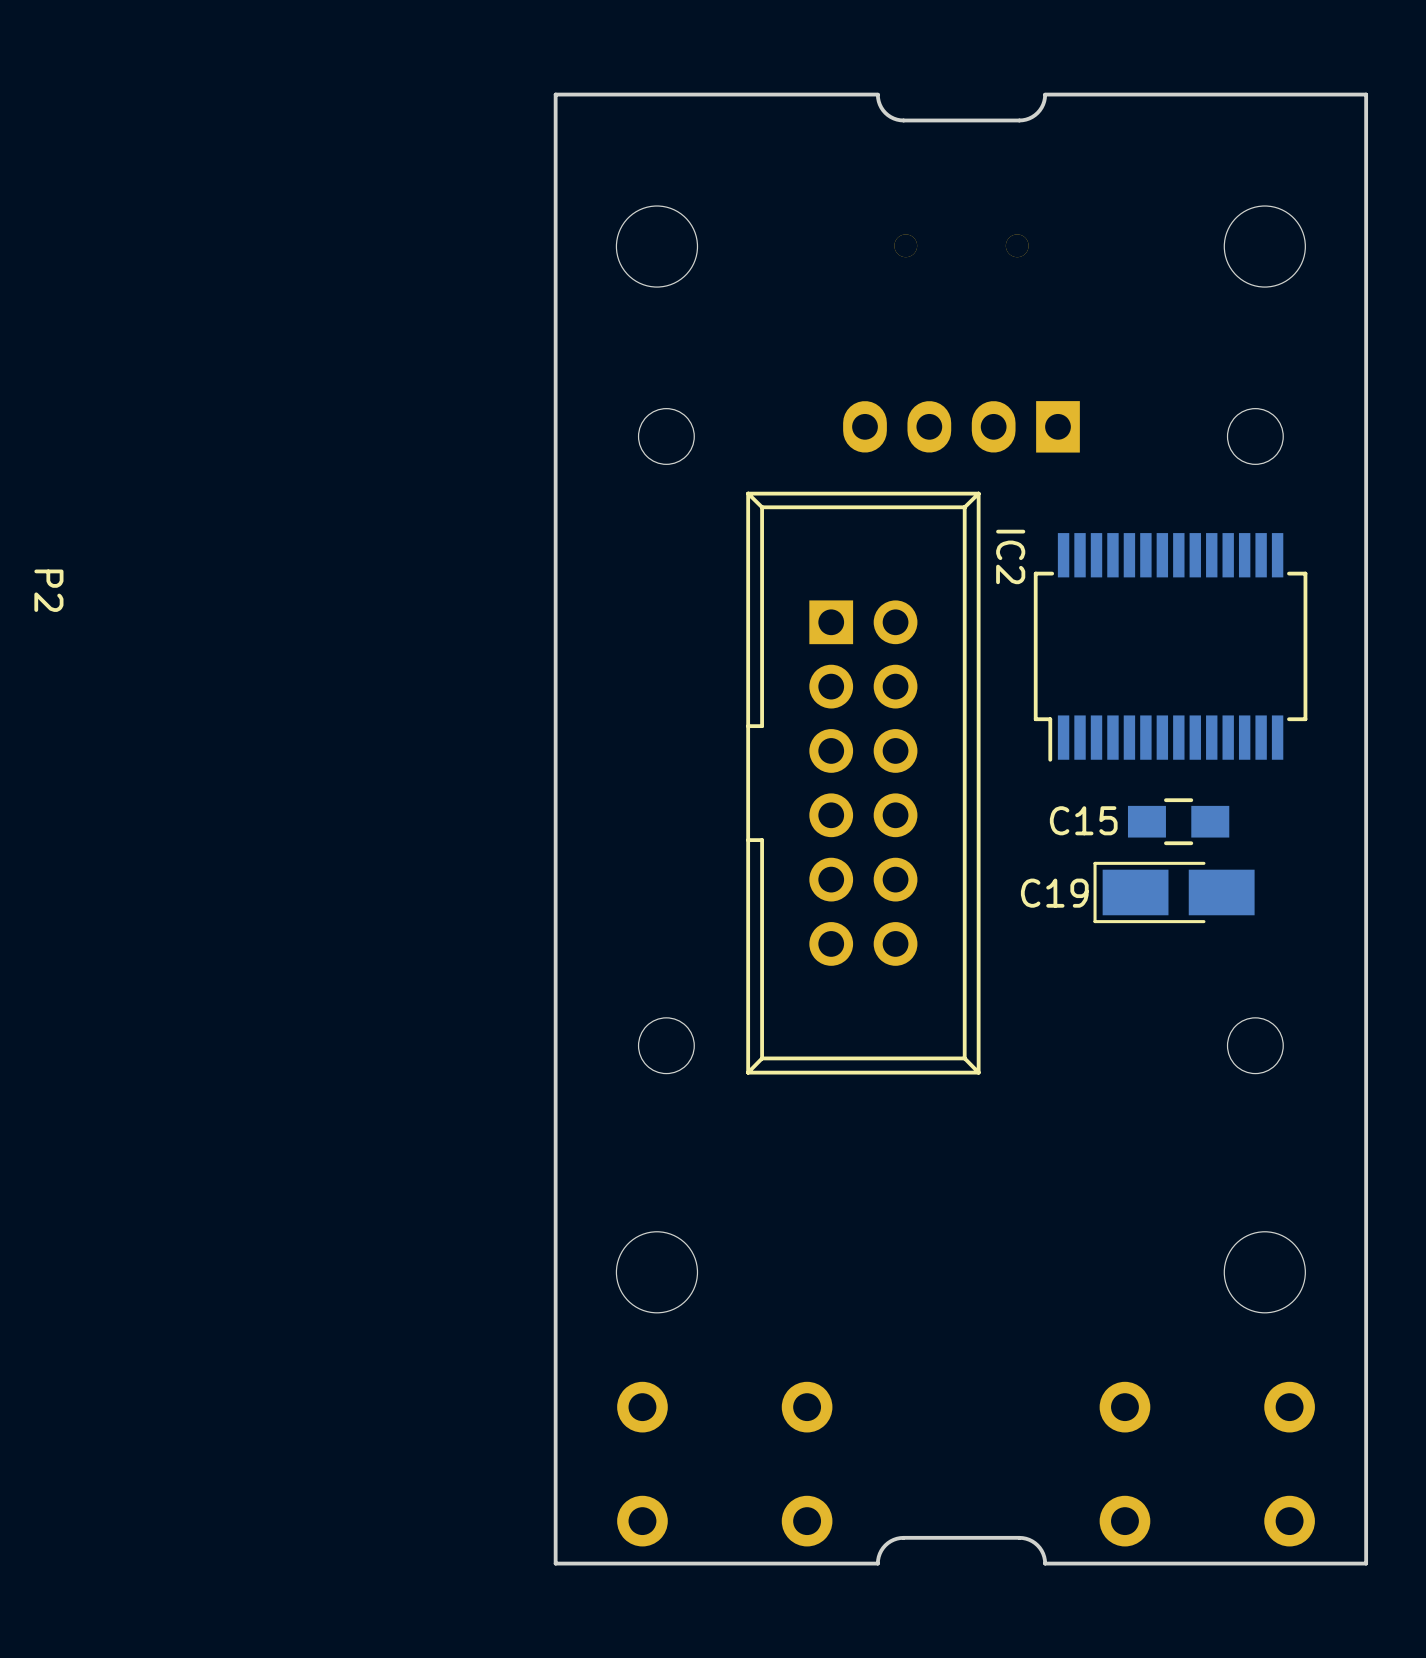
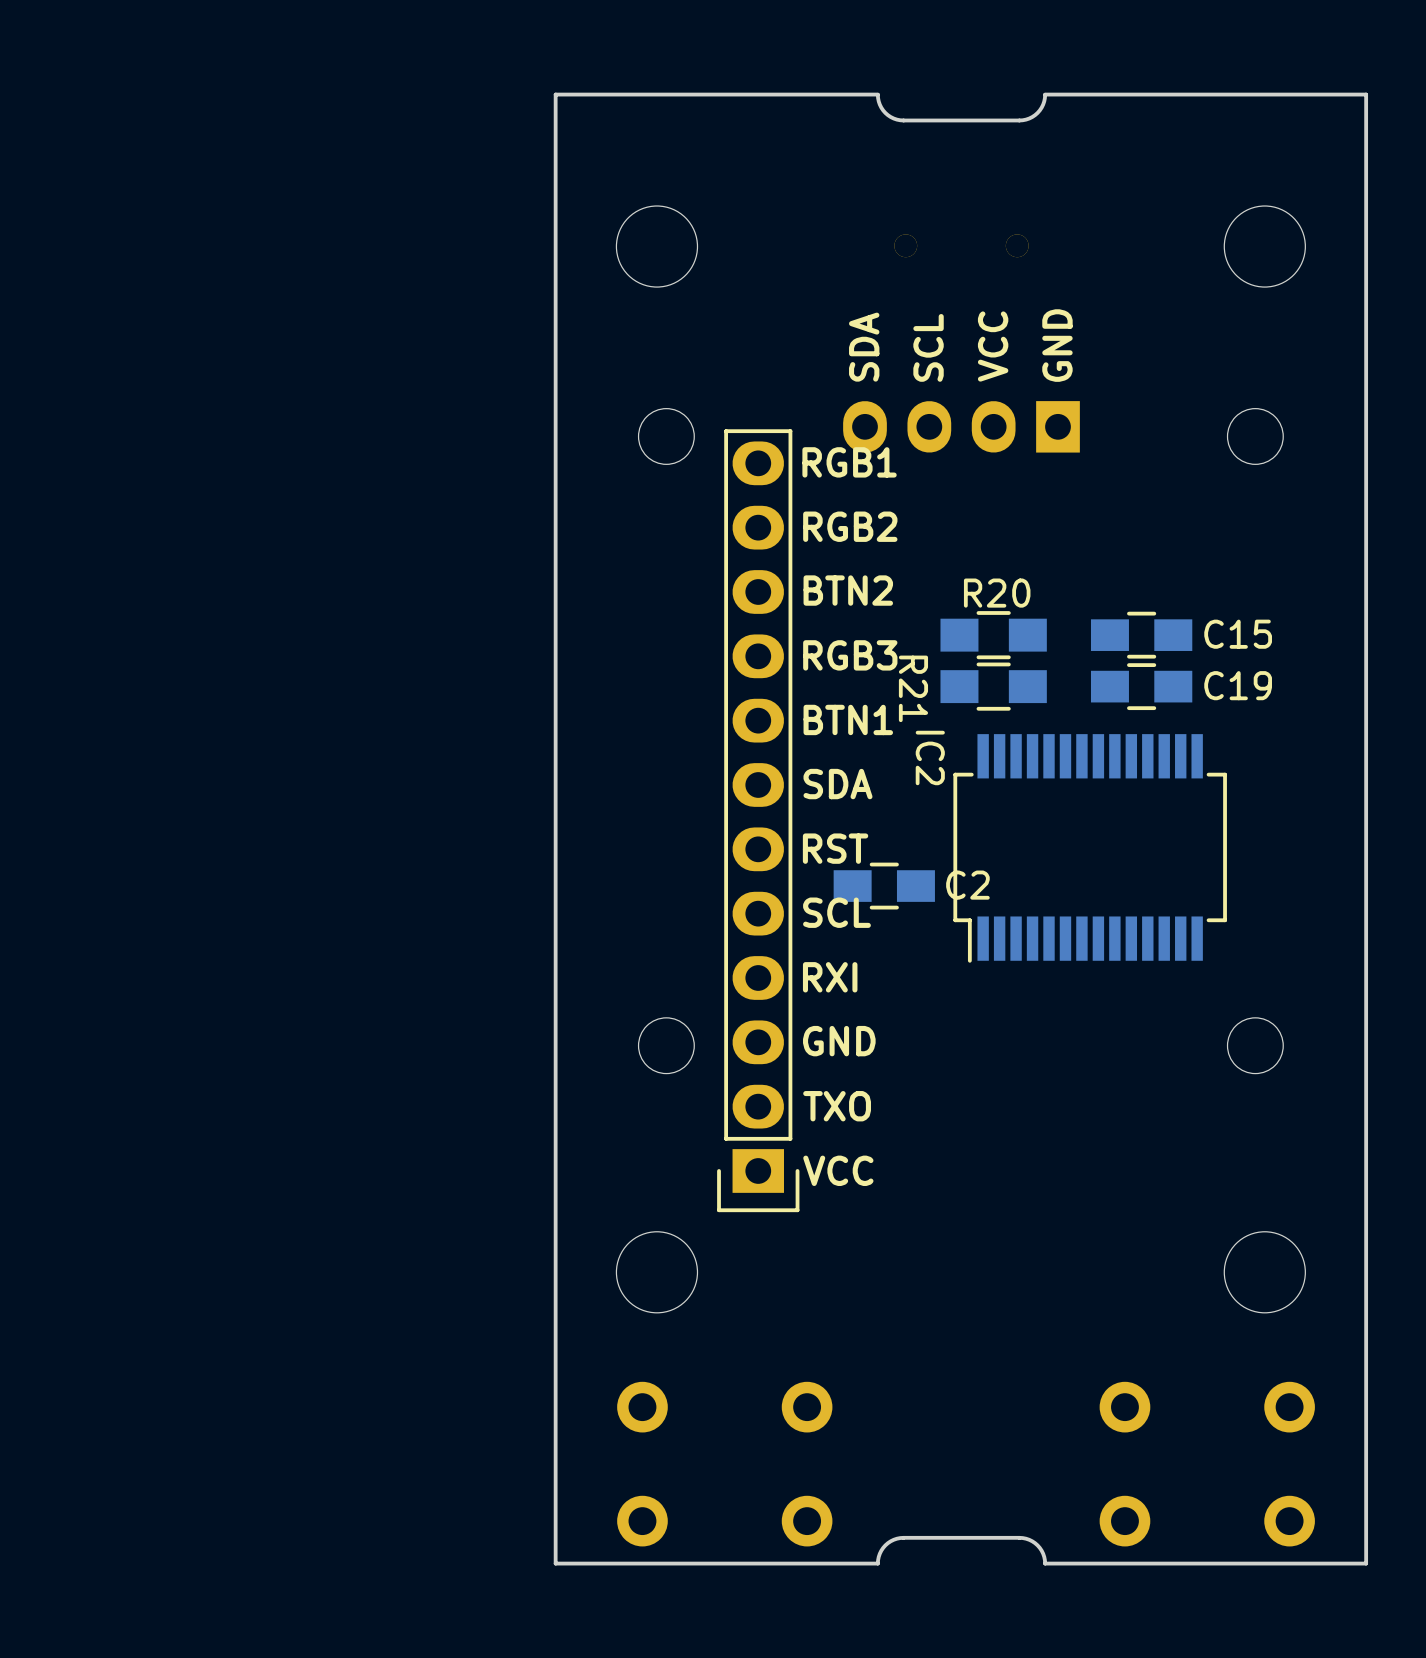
text: none -> GND (1057, 345)
text: none -> VCC (993, 346)
text: none -> SDA (864, 347)
text: none -> SCL (928, 347)
text: none -> RGB1 (849, 462)
text: none -> RGB2 (850, 526)
text: none -> BTN2 (848, 590)
R20: none -> (993, 635)
IC2 position: (1170, 647) -> (1090, 848)
text: none -> RGB3 (850, 655)
R21: none -> (993, 686)
text: none -> BTN1 (848, 719)
P2: (863, 783) -> none
text: none -> SDA (837, 784)
part: none -> (758, 820)
C15 name position: C15 (1083, 820) -> C15 (1238, 634)
C15 position: (1178, 821) -> (1141, 635)
text: none -> RST (835, 848)
C19 footprint: [1093, 861, 1255, 924] -> [1090, 663, 1193, 711]
C2: none -> (884, 886)
C19 name position: C19 (1054, 893) -> C19 (1238, 685)
text: none -> SCL (836, 912)
text: none -> RXI (830, 977)
text: none -> GND (839, 1041)
text: none -> TXO (837, 1106)
text: none -> VCC (838, 1170)

